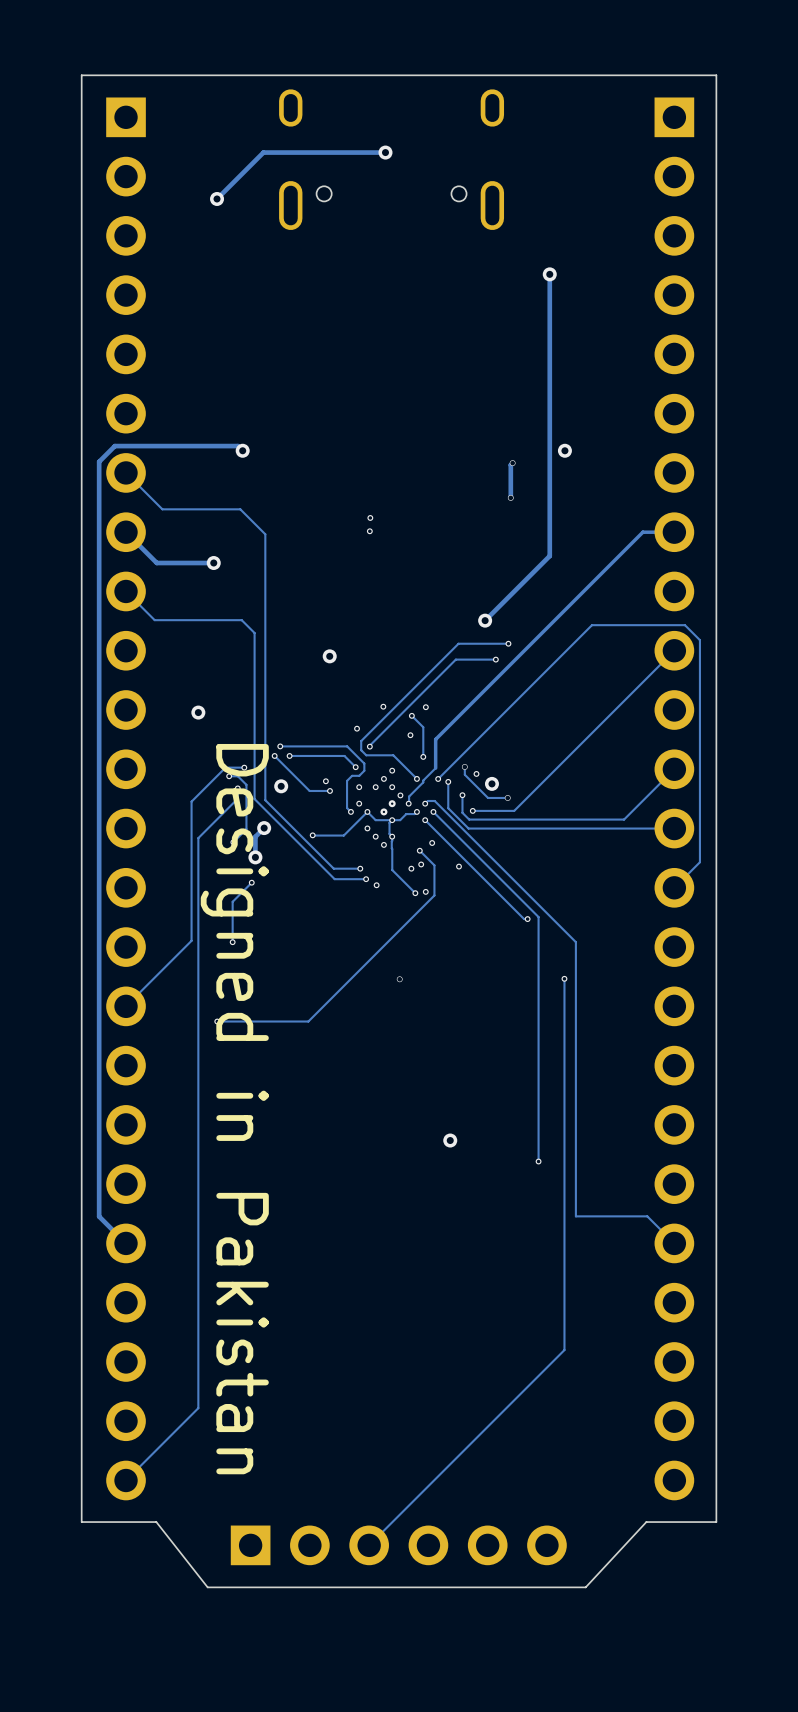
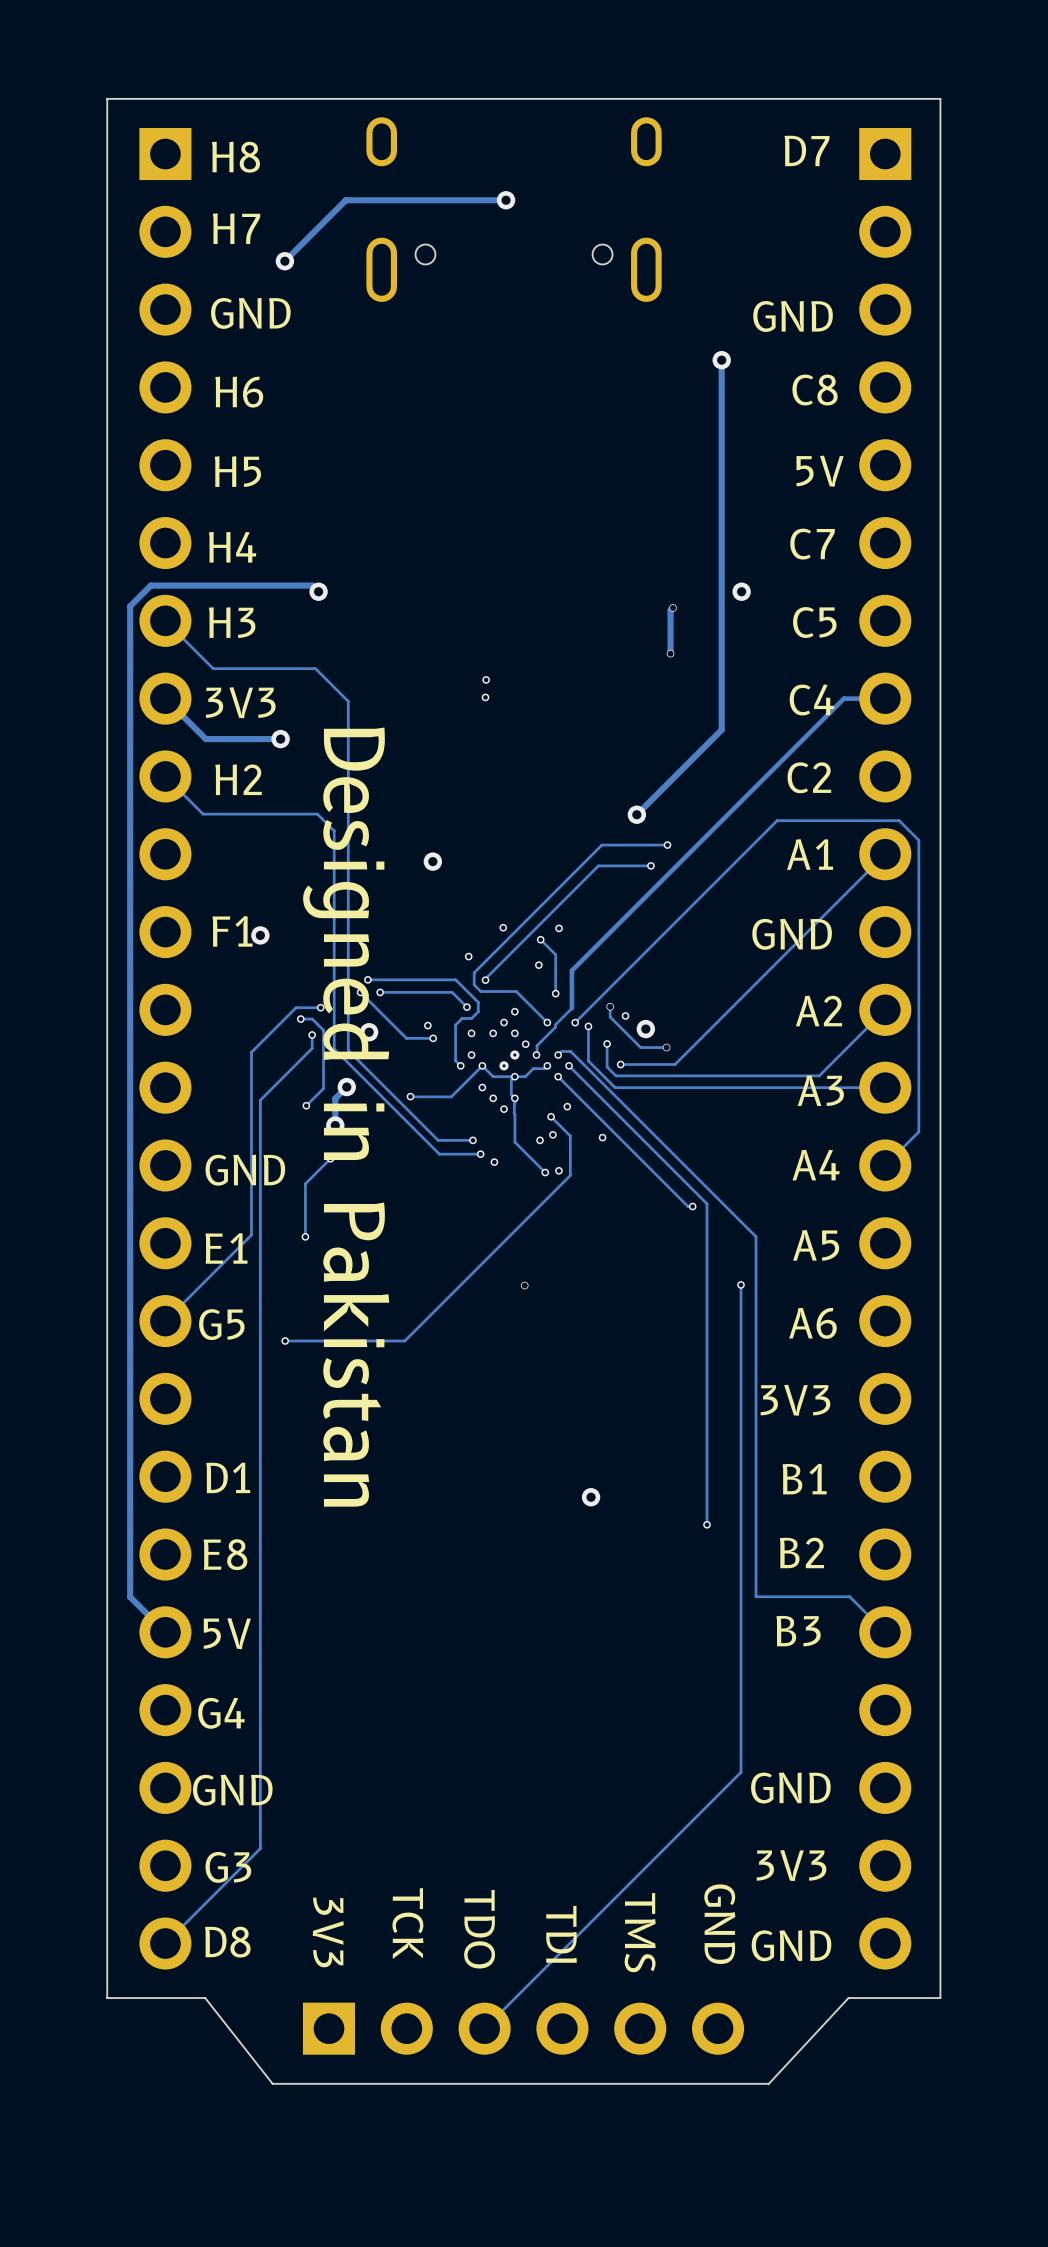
text: none -> D7 (807, 150)
text: none -> H8 (235, 157)
text: none -> H7 (236, 228)
text: none -> GND (250, 313)
text: none -> GND (793, 316)
text: none -> C8 (815, 390)
text: none -> H6 (239, 392)
text: none -> 5V (820, 471)
text: none -> H5 (237, 471)
text: none -> C7 (812, 544)
text: none -> H4 (232, 547)
text: none -> H3 (232, 622)
text: none -> C5 (814, 622)
text: none -> C4 (811, 699)
text: none -> 3V3 (240, 702)
text: none -> C2 (809, 777)
text: none -> H2 (238, 779)
text: none -> A1 (810, 854)
text: none -> F1 (232, 931)
text: none -> GND (792, 934)
text: none -> A2 (818, 1011)
text: none -> A3 (820, 1090)
text: none -> A4 (816, 1165)
text: none -> GND (245, 1170)
text: none -> A5 (816, 1245)
text: none -> E1 (226, 1248)
text: none -> A6 (812, 1323)
text: none -> G5 (221, 1324)
text: none -> 3V3 (795, 1400)
text position: Designed in Pakistan (234, 1109) -> Designed in Pakistan (346, 1117)
text: none -> D1 (228, 1477)
text: none -> B1 (804, 1479)
text: none -> B2 (801, 1552)
text: none -> E8 (225, 1554)
text: none -> B3 (798, 1631)
text: none -> 5V (227, 1633)
text: none -> G4 (221, 1713)
text: none -> GND (790, 1788)
text: none -> GND (232, 1790)
text: none -> 3V3 (791, 1865)
text: none -> G3 (228, 1867)
text: none -> TCK (407, 1923)
text: none -> TDO (479, 1929)
text: none -> GND (719, 1924)
text: none -> TMS (640, 1932)
text: none -> 3V3 (328, 1932)
text: none -> TDI (561, 1934)
text: none -> D8 (227, 1942)
text: none -> GND (791, 1945)

